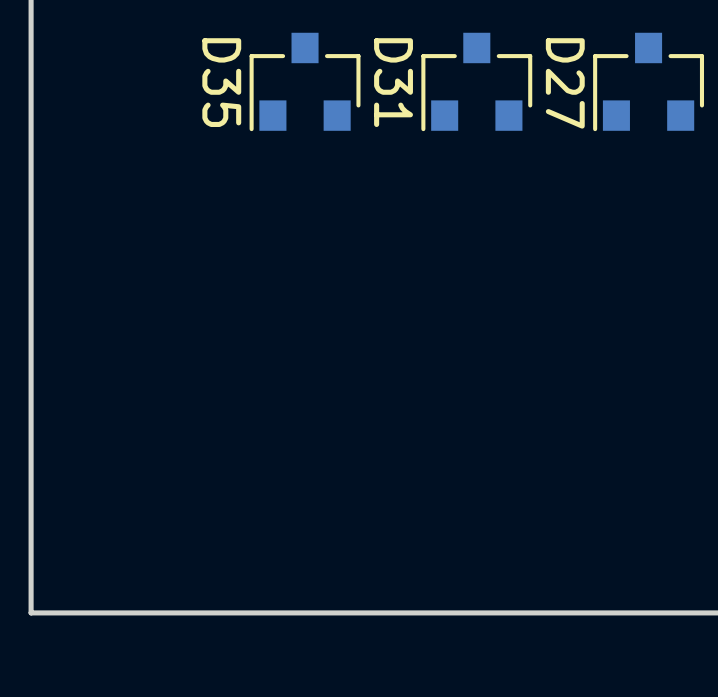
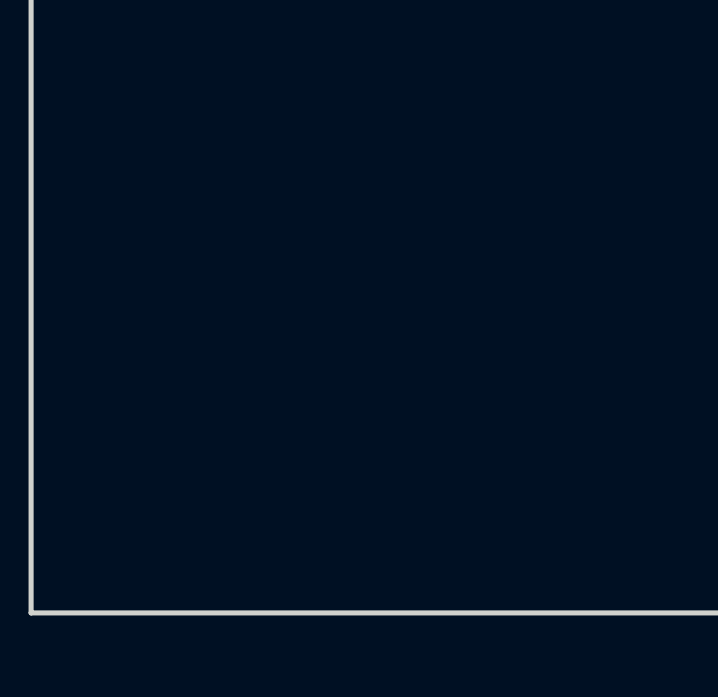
D35: (305, 81) -> none
D31: (476, 81) -> none
D27: (648, 81) -> none

